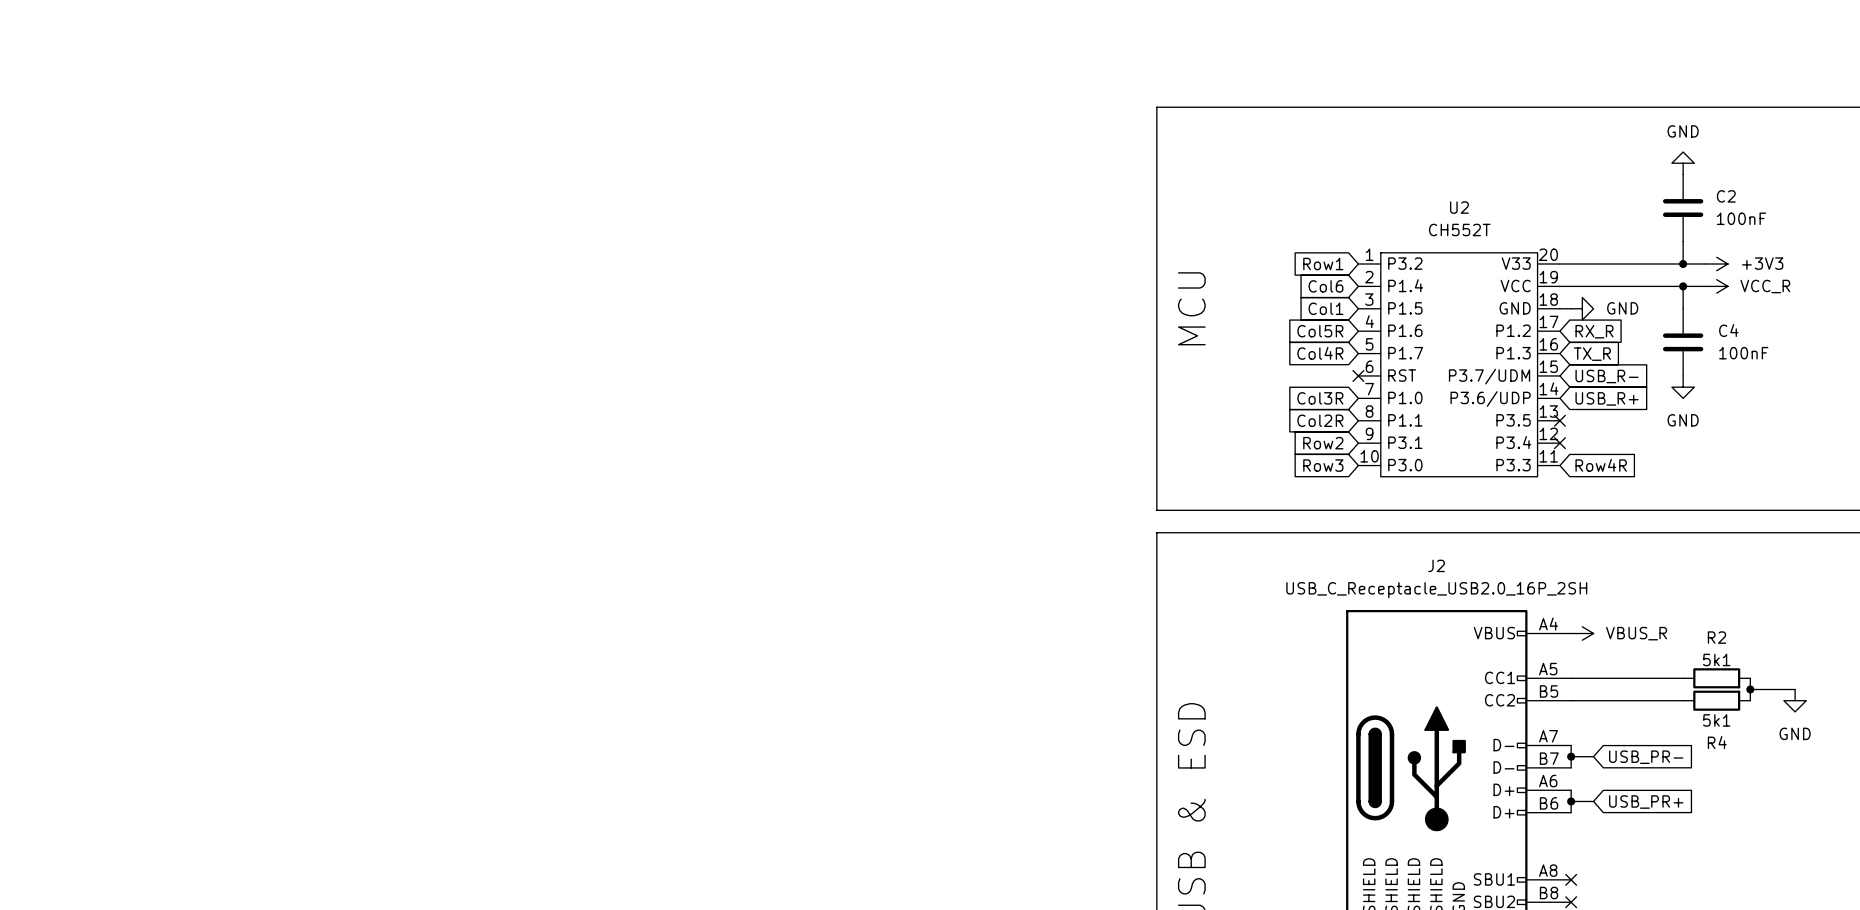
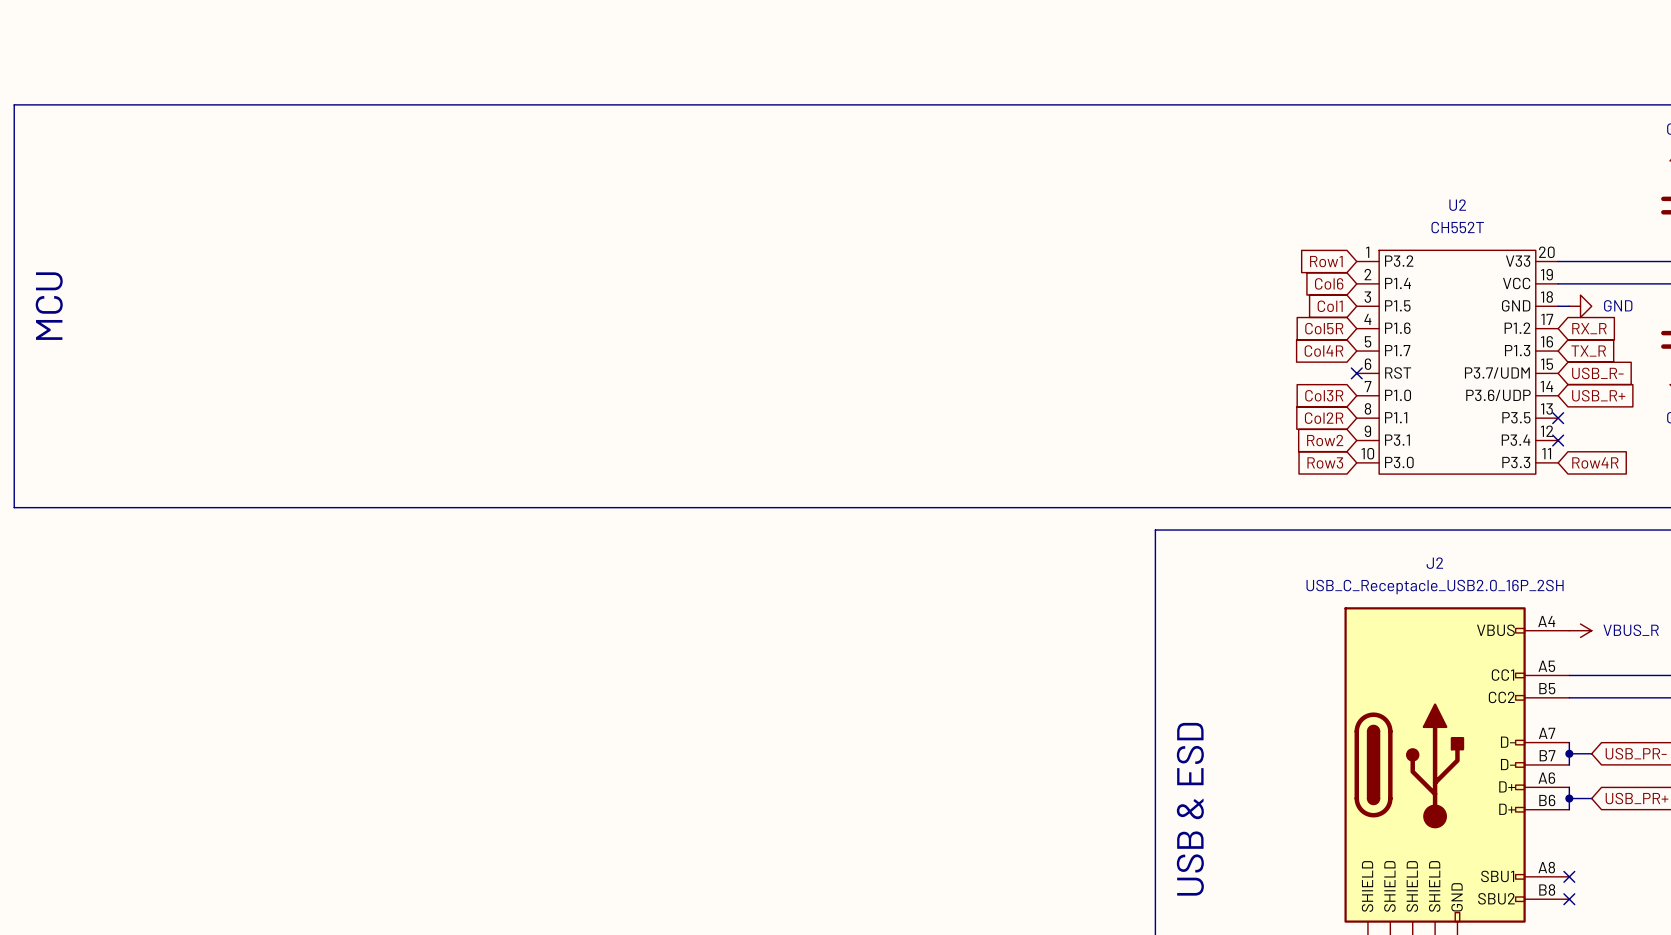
line: (1156, 107) (1156, 510) -> (1155, 104) (14, 104) (14, 507) (1155, 507)
text: none -> MCU (49, 306)
text: MCU (1191, 308) -> none

